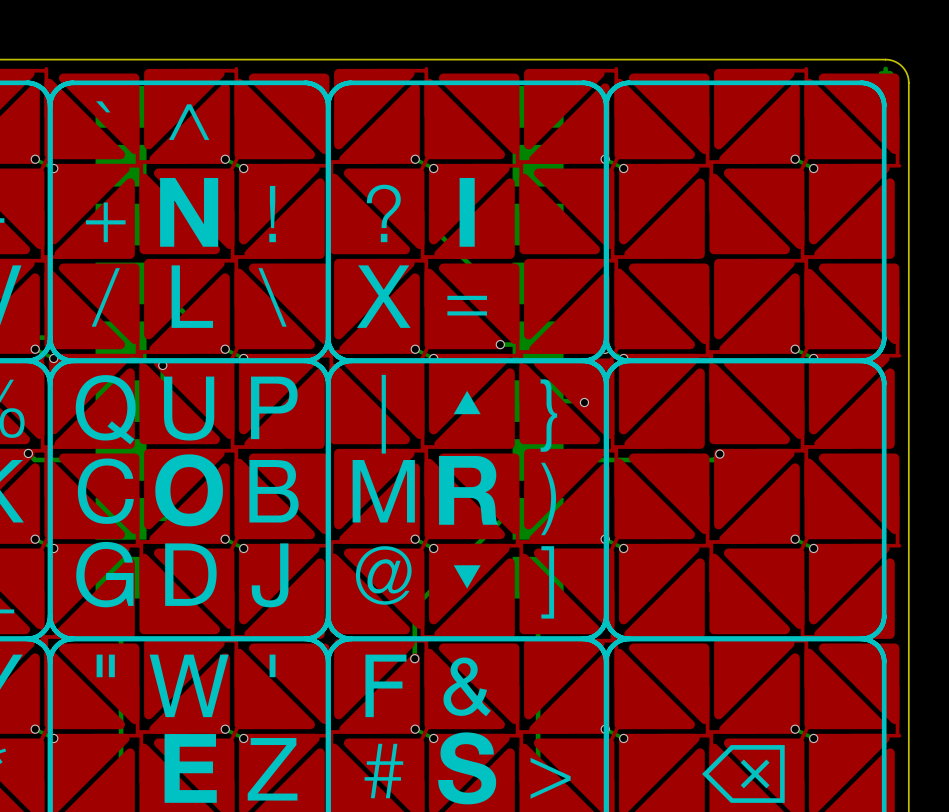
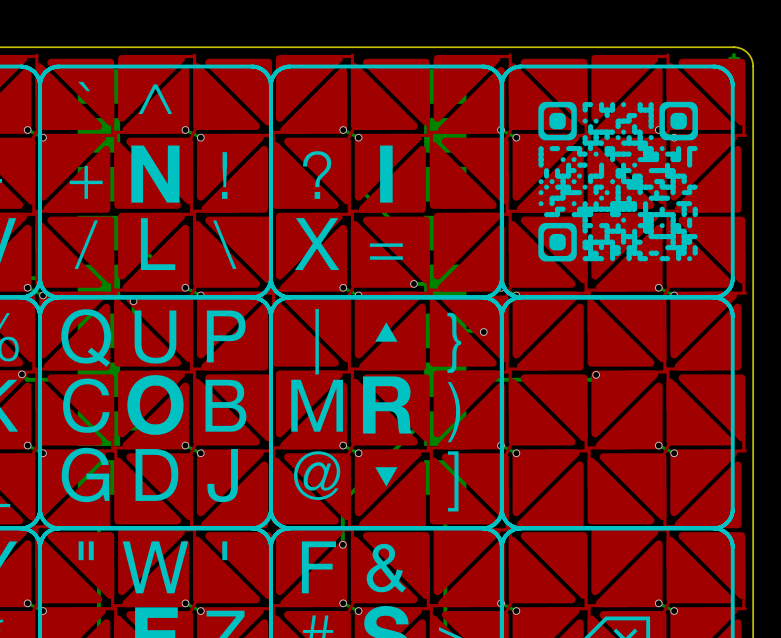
drawing: none -> [538, 101, 698, 262]

